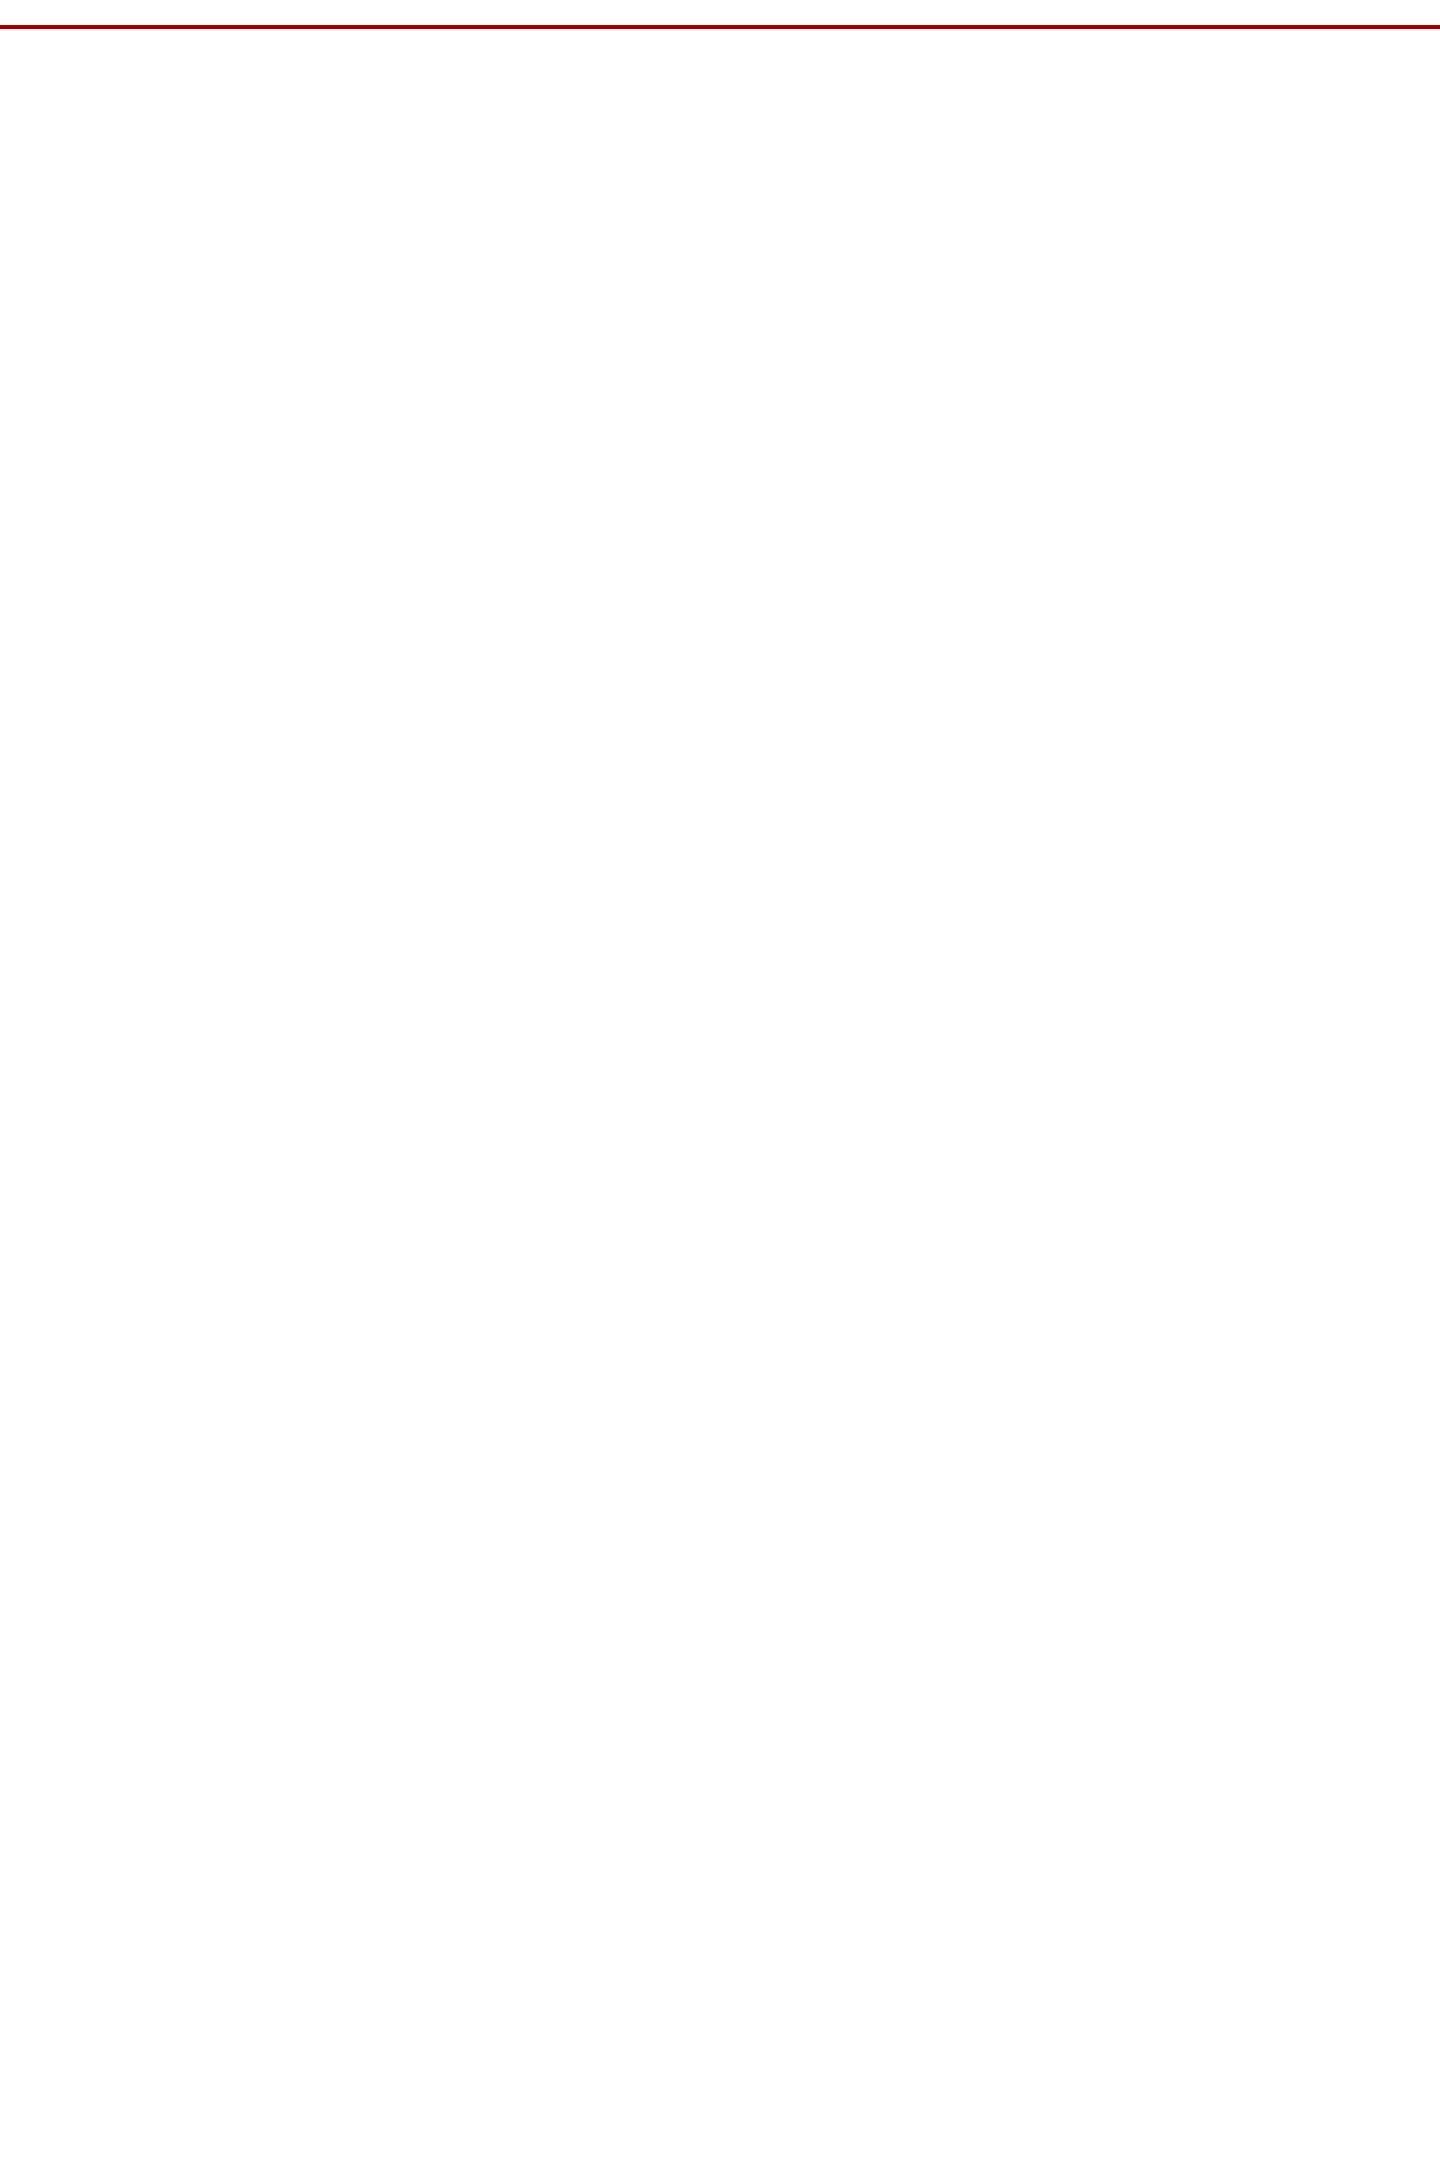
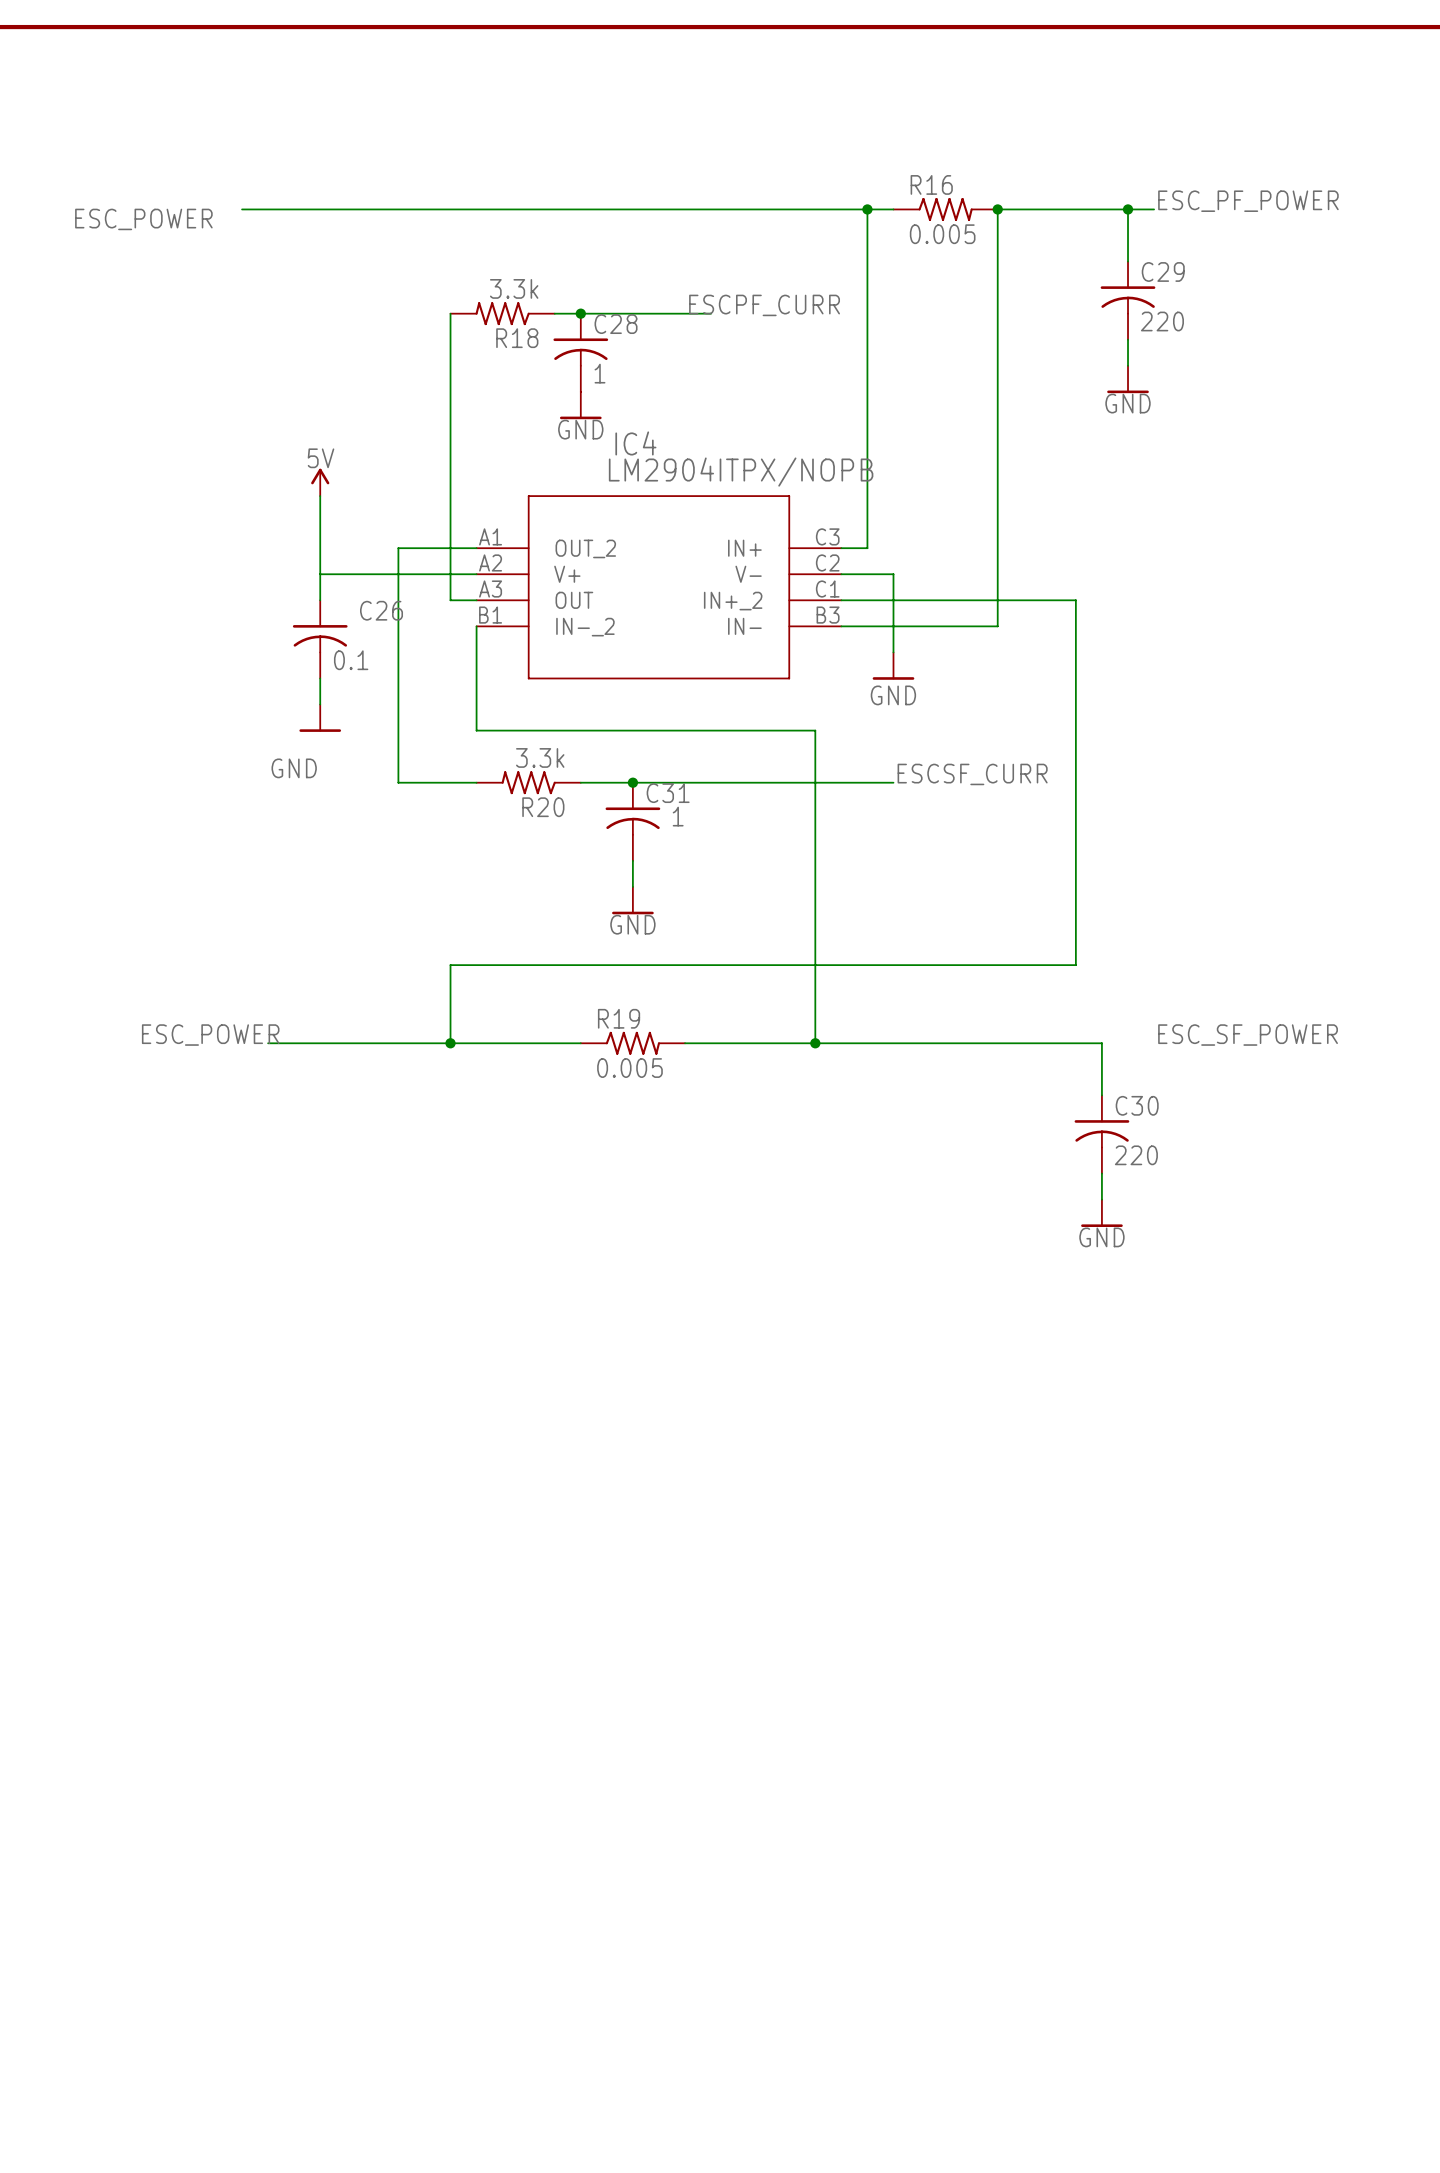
label: none -> ESC_PF_POWER (1248, 201)
wire: none -> (242, 209) (893, 209)
wire: none -> (867, 209) (867, 548) (841, 548)
junction: none -> (867, 209)
R16: none -> 0.005 (945, 209)
junction: none -> (997, 209)
wire: none -> (1128, 209) (1128, 261)
junction: none -> (1128, 209)
wire: none -> (1154, 209) (997, 209) (997, 626) (841, 626)
label: none -> ESC_POWER (143, 219)
C29: none -> 220 (1128, 300)
label: none -> ESCPF_CURR (764, 305)
wire: none -> (450, 313) (450, 600) (476, 600)
R18: none -> 3.3k (502, 313)
wire: none -> (554, 313) (711, 313)
junction: none -> (580, 313)
wire: none -> (1128, 339) (1128, 365)
C28: none -> 1 (580, 352)
power symbol: none -> GND (1128, 379)
power symbol: none -> GND (580, 405)
power symbol: none -> 5V (320, 482)
wire: none -> (320, 496) (320, 600)
wire: none -> (476, 548) (398, 548) (398, 782) (476, 782)
wire: none -> (320, 574) (476, 574)
wire: none -> (841, 574) (893, 574) (893, 652)
IC4: none -> LM2904ITPX/NOPB (658, 587)
wire: none -> (841, 600) (1075, 600) (1075, 965) (450, 965) (450, 1043)
wire: none -> (476, 626) (476, 730) (815, 730) (815, 1043)
C26: none -> 0.1 (320, 639)
power symbol: none -> GND (893, 666)
wire: none -> (320, 678) (320, 704)
power symbol: none -> GND (320, 718)
label: none -> ESCSF_CURR (972, 774)
R20: none -> 3.3k (528, 782)
wire: none -> (580, 782) (893, 782)
junction: none -> (632, 782)
C31: none -> 1 (632, 821)
wire: none -> (632, 860) (632, 886)
power symbol: none -> GND (632, 900)
label: none -> ESC_POWER (210, 1035)
label: none -> ESC_SF_POWER (1248, 1035)
wire: none -> (268, 1043) (580, 1043)
junction: none -> (450, 1043)
R19: none -> 0.005 (632, 1043)
wire: none -> (685, 1043) (1101, 1043) (1101, 1095)
junction: none -> (815, 1043)
C30: none -> 220 (1101, 1134)
wire: none -> (1101, 1173) (1101, 1199)
power symbol: none -> GND (1101, 1213)

